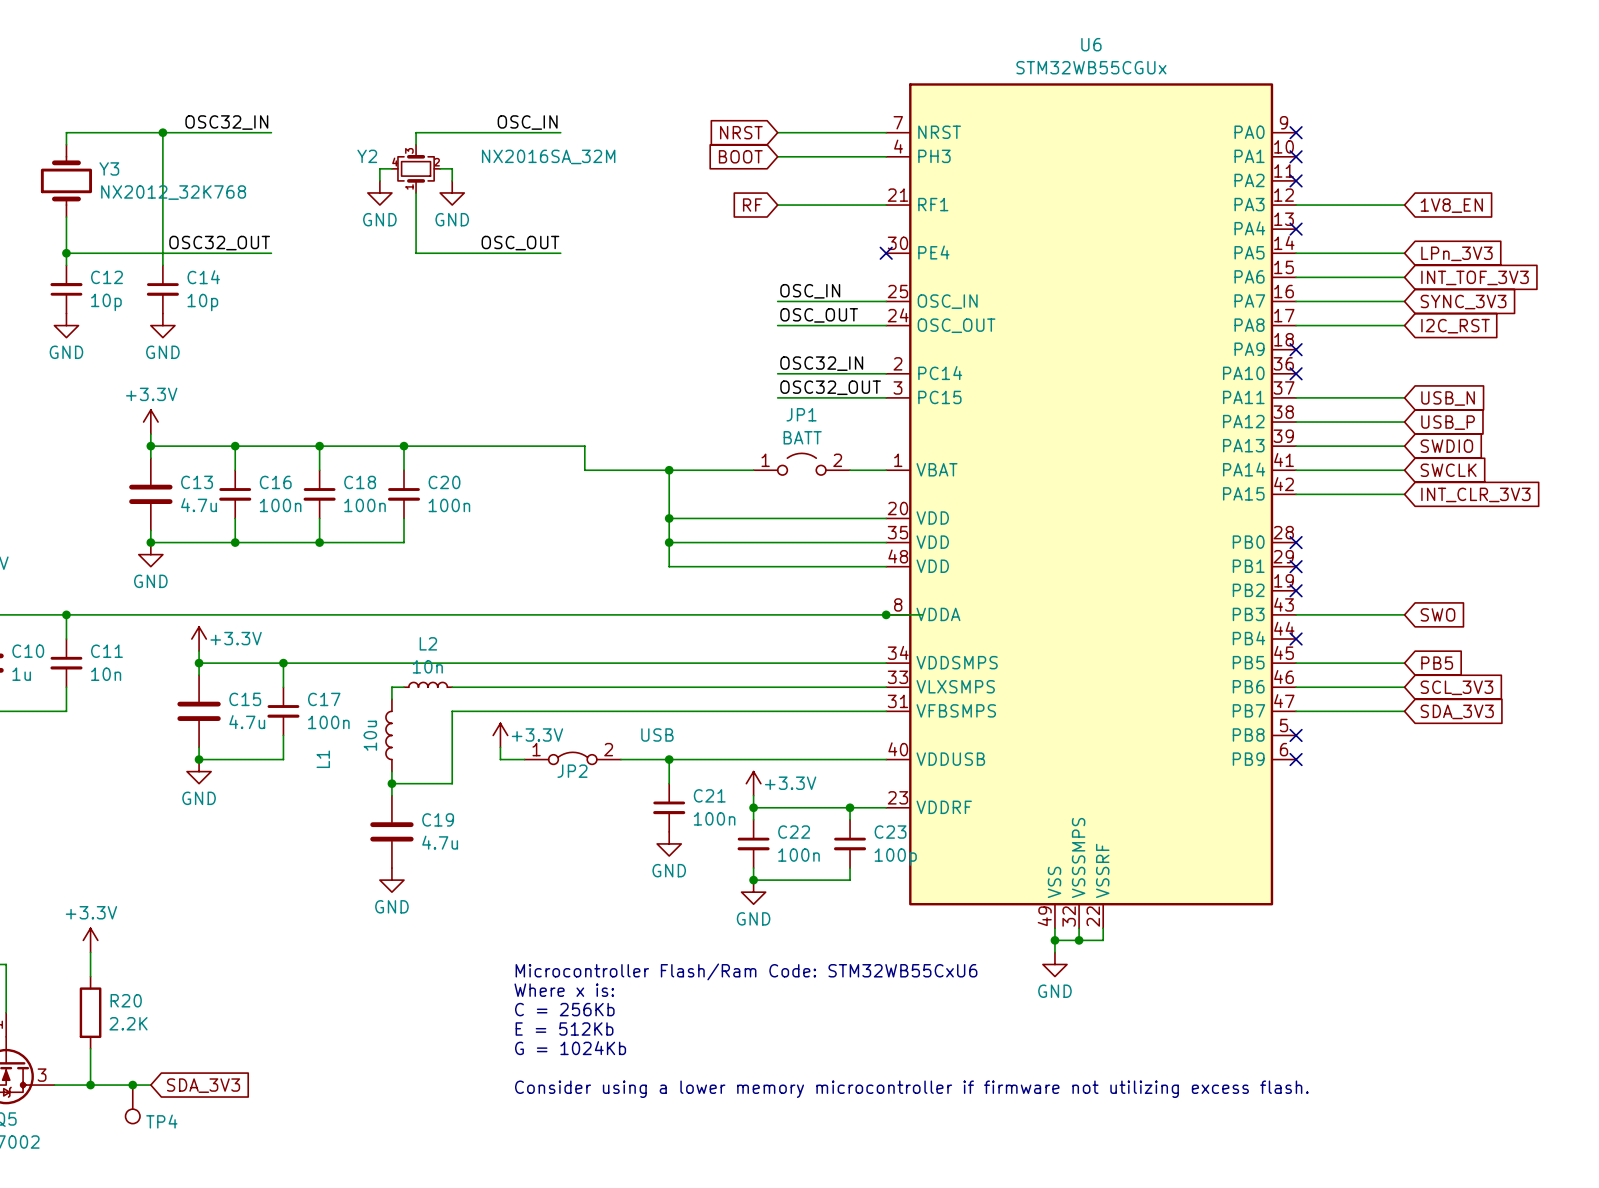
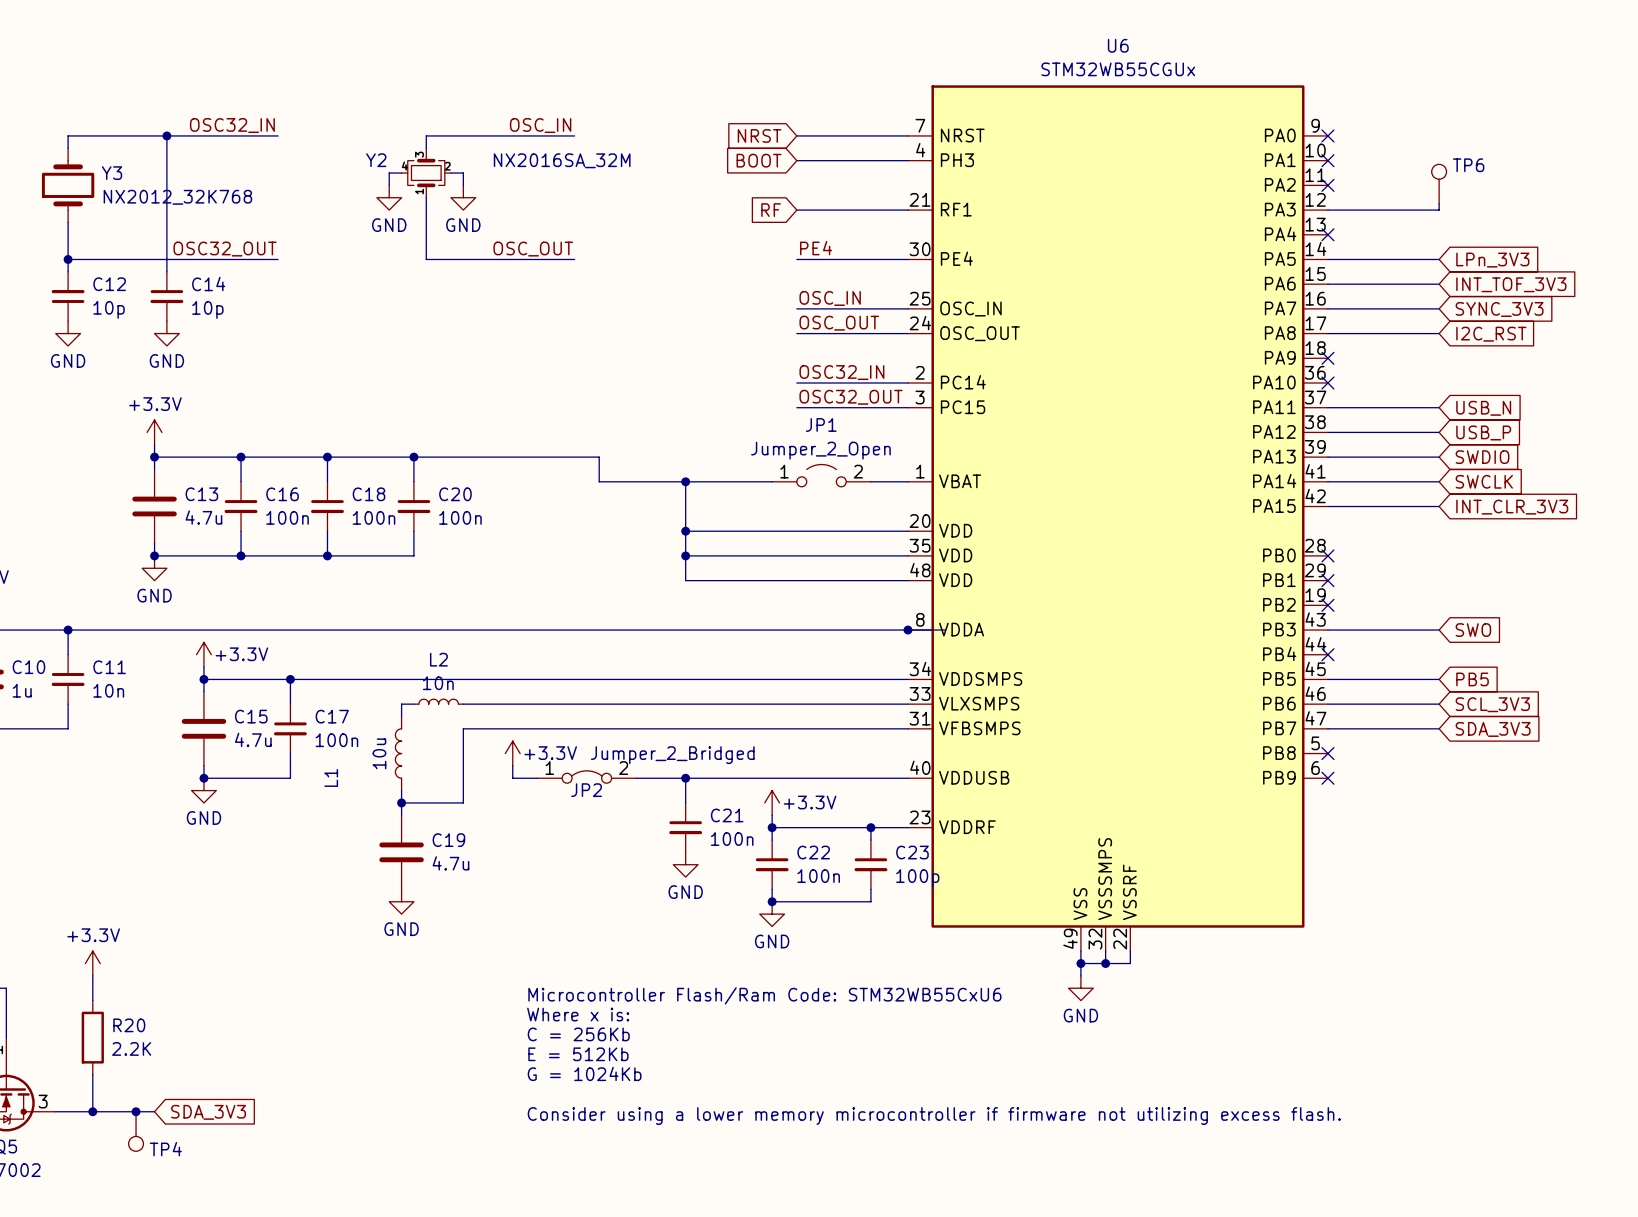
TP6: none -> (1439, 184)
wire: none -> (1439, 203) (1439, 210)
global label: 1V8_EN (1451, 205) -> none
label: none -> PE4 (816, 248)
wire: none -> (796, 259) (908, 259)
no-connect mark: (886, 253) -> none
JP1 value: BATT (802, 437) -> Jumper_2_Open (820, 450)
JP2 value: USB (657, 735) -> Jumper_2_Bridged (672, 755)

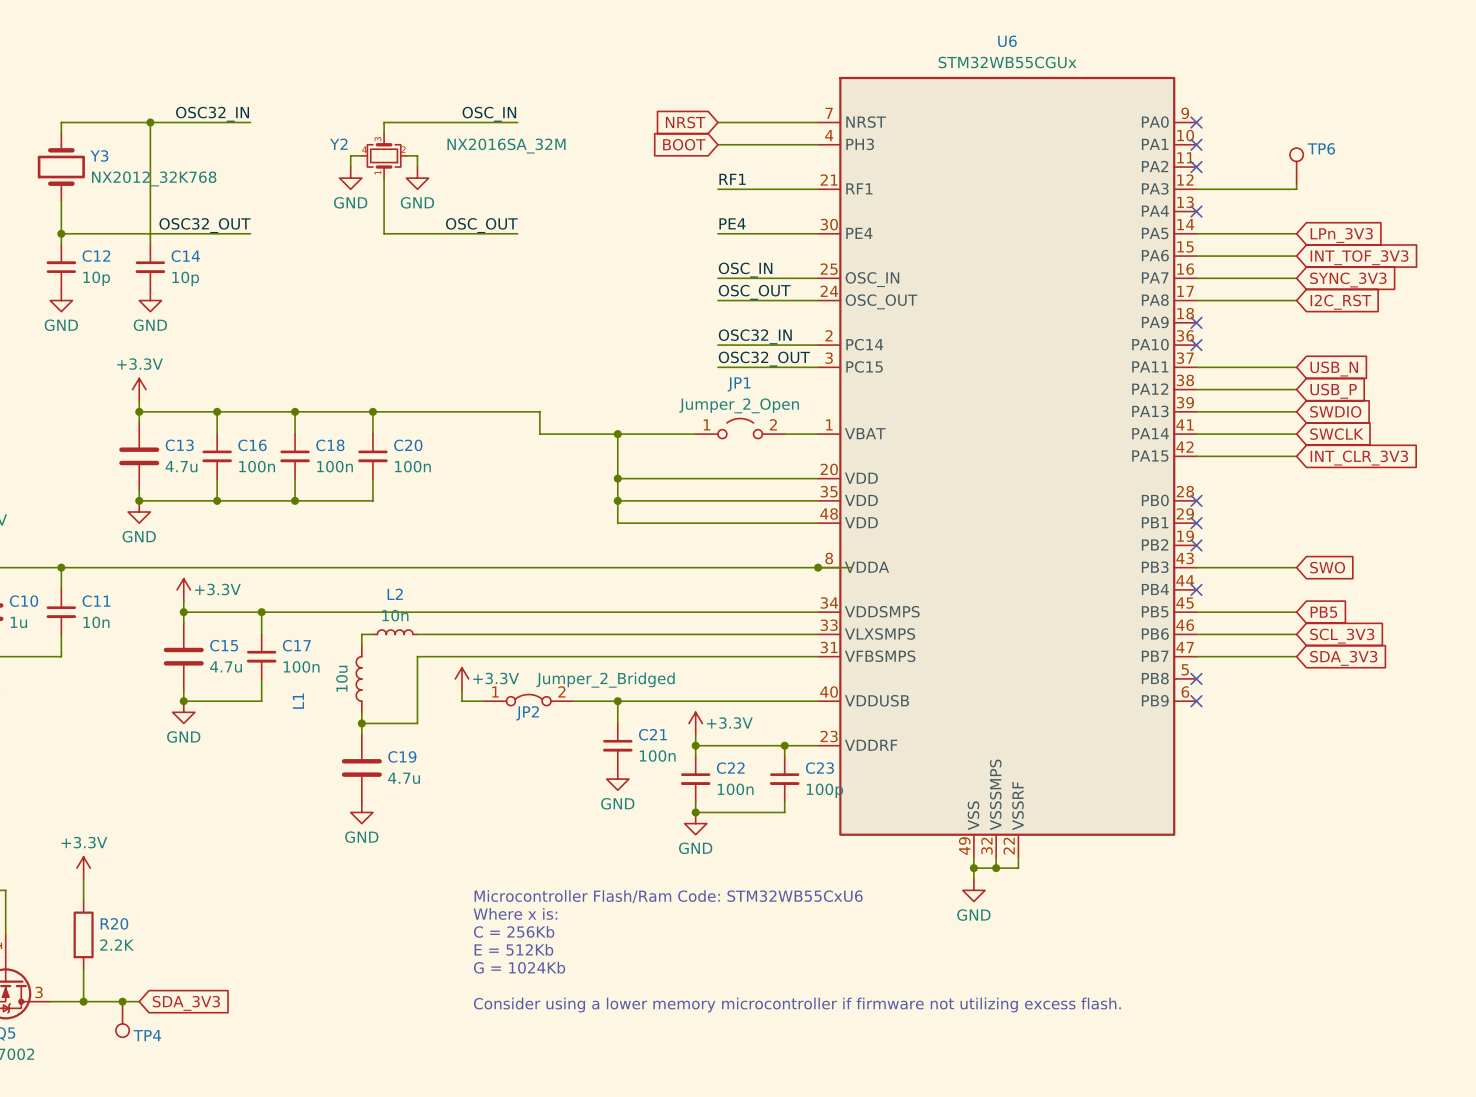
label: none -> RF1 (732, 179)
global label: RF (771, 210) -> none

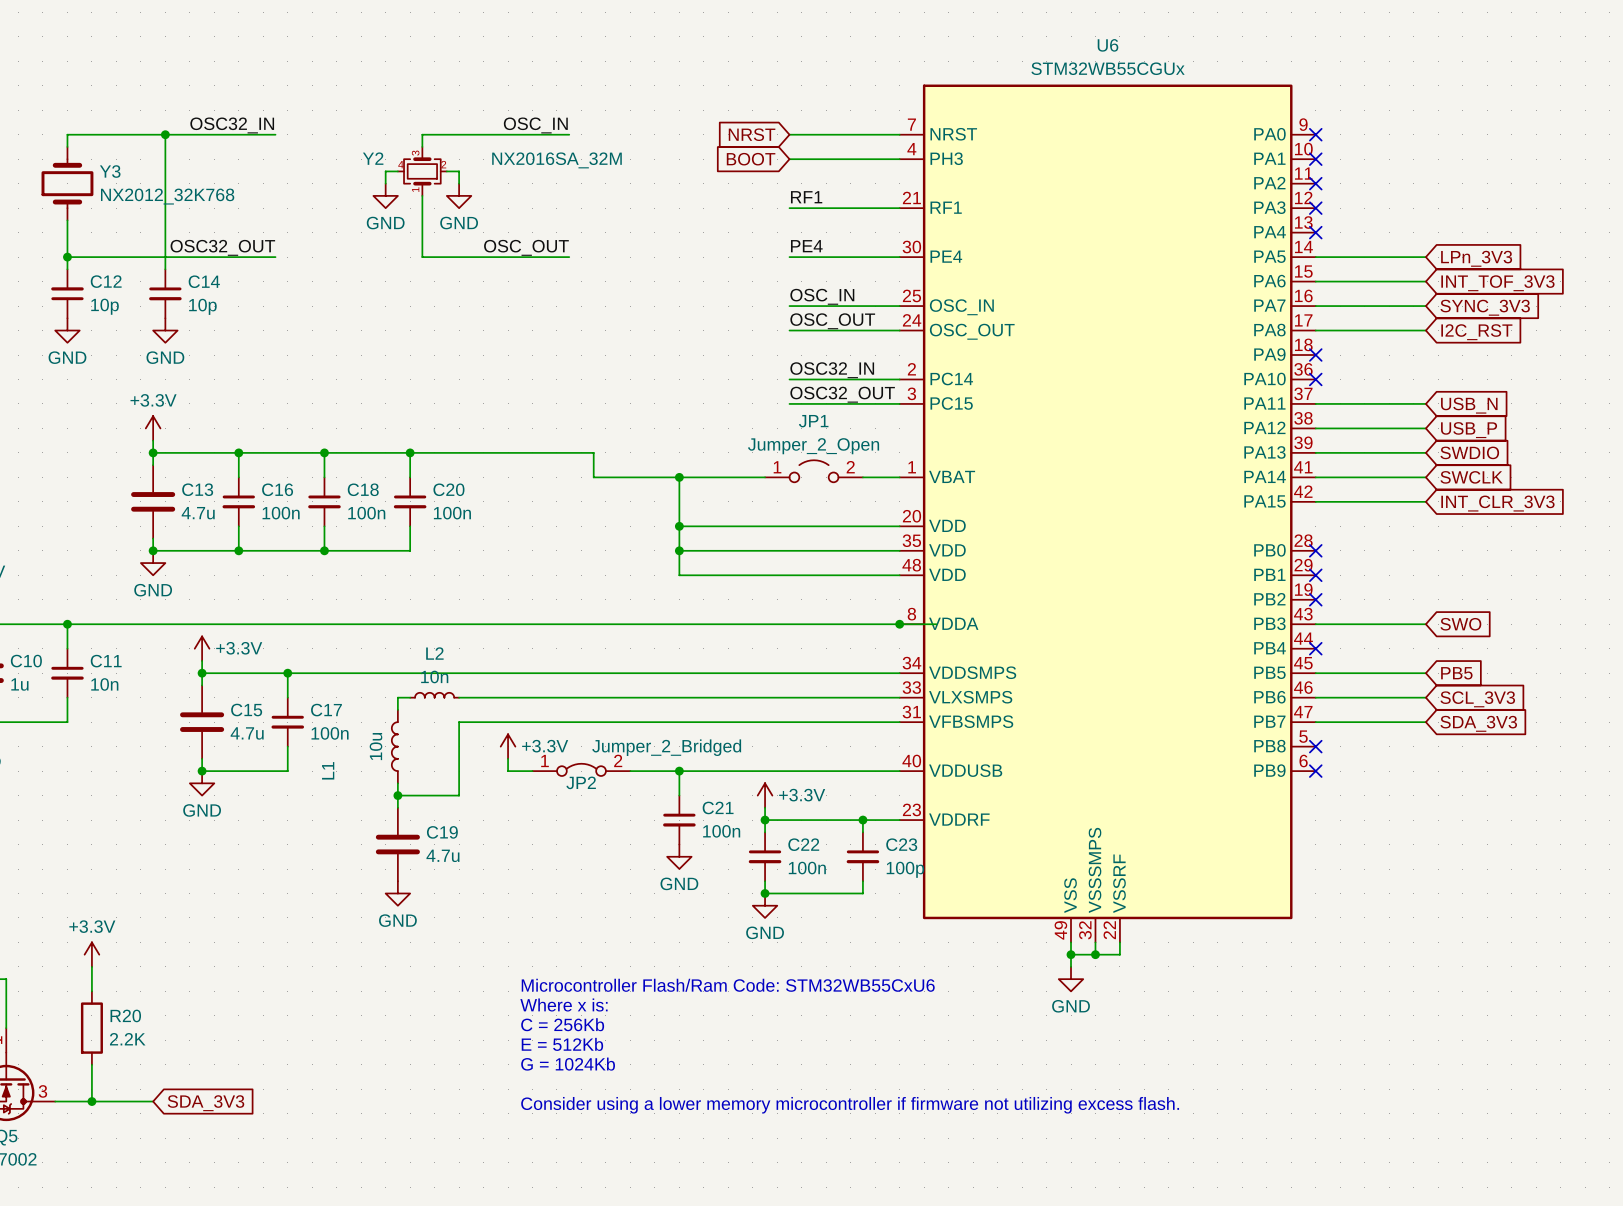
TP6: (1296, 165) -> none
wire: (1296, 183) (1296, 189) (1196, 189) -> none
no-connect mark: none -> (1315, 208)
junction: (122, 1001) -> none
TP4: (122, 1019) -> none

